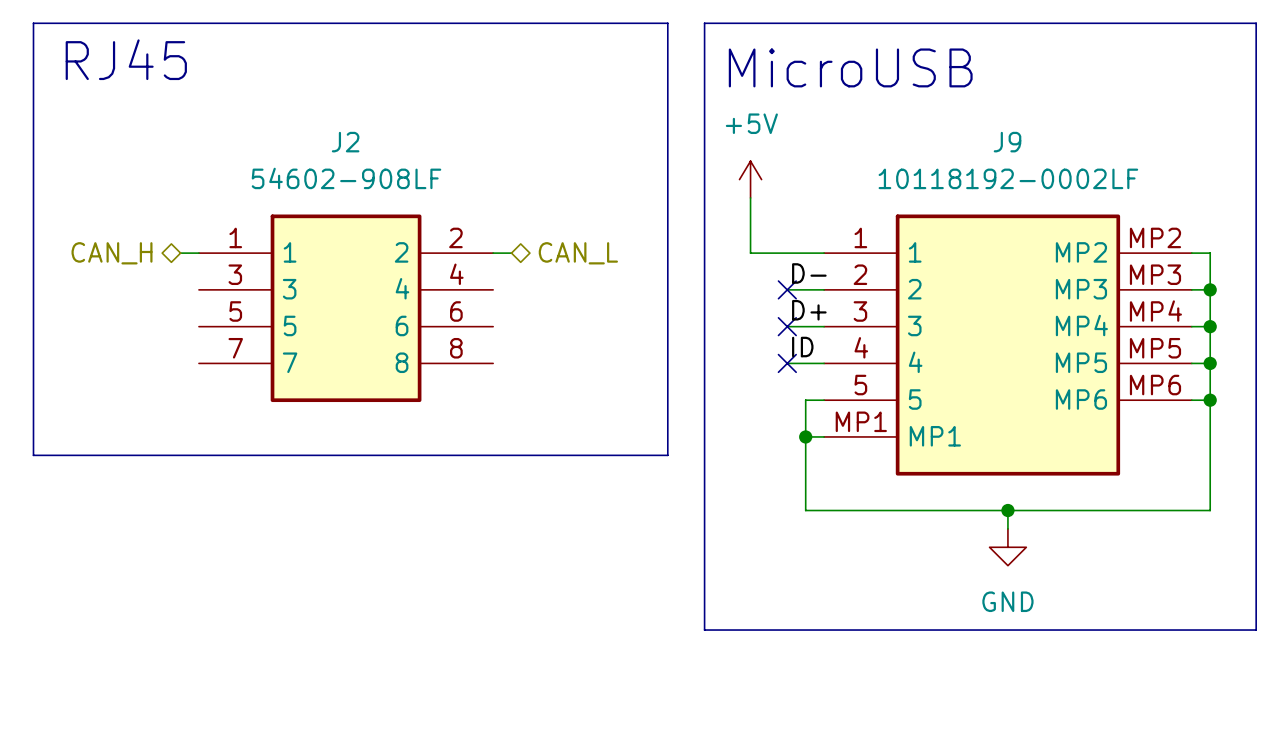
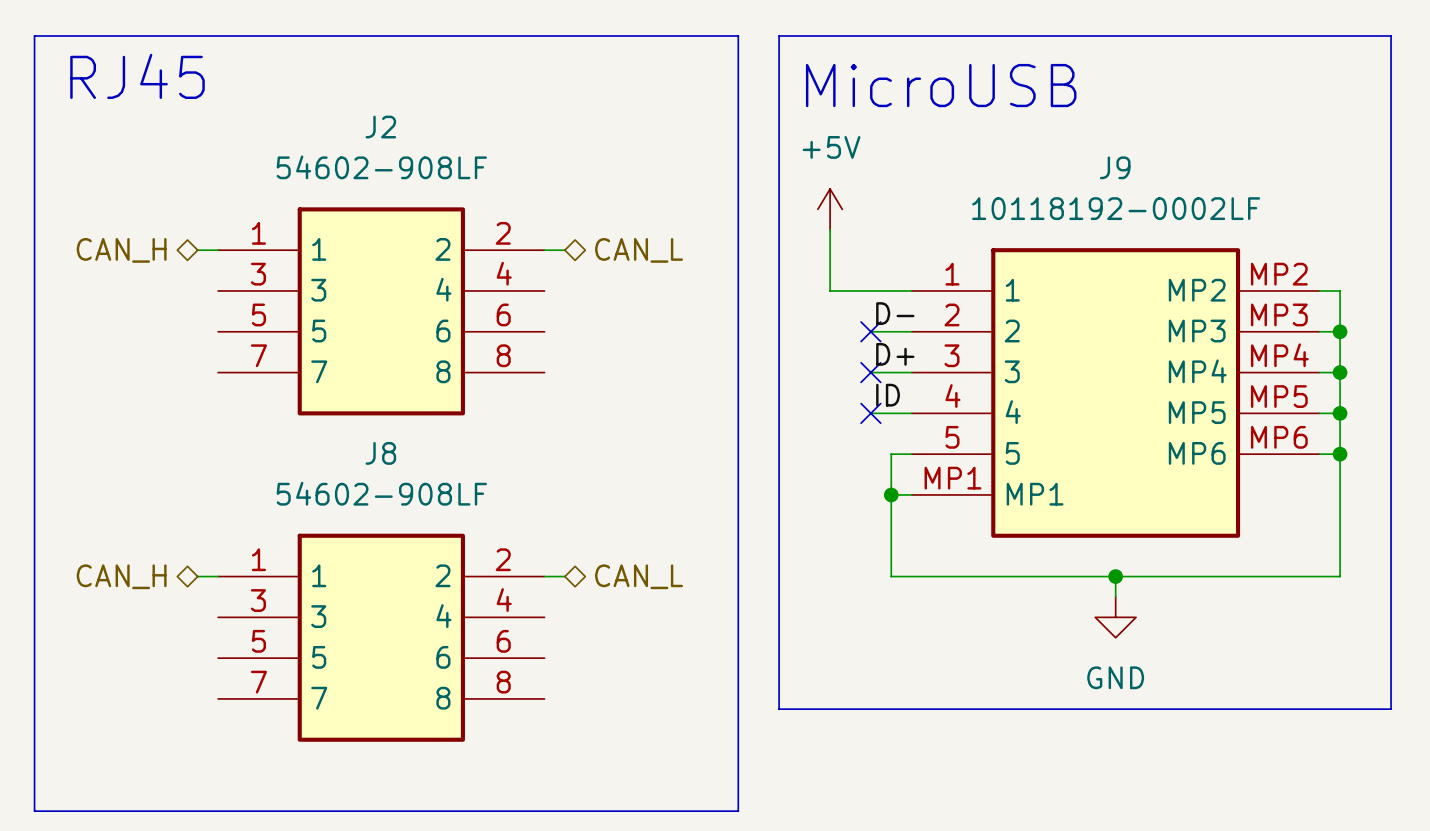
hierarchical label position: CAN_H (112, 253) -> CAN_H (121, 250)
wire: (180, 253) (198, 253) -> (197, 250) (218, 250)
wire: (493, 253) (511, 253) -> (544, 250) (564, 250)
hierarchical label position: CAN_L (578, 253) -> CAN_L (639, 250)
J2 position: (346, 308) -> (381, 311)
line: (33, 455) (667, 455) -> (34, 515) (34, 811) (738, 811) (738, 515)
hierarchical label: none -> CAN_H (121, 576)
wire: none -> (197, 576) (218, 576)
wire: none -> (544, 576) (564, 576)
hierarchical label: none -> CAN_L (639, 576)
J8: none -> 54602-908LF (381, 637)

